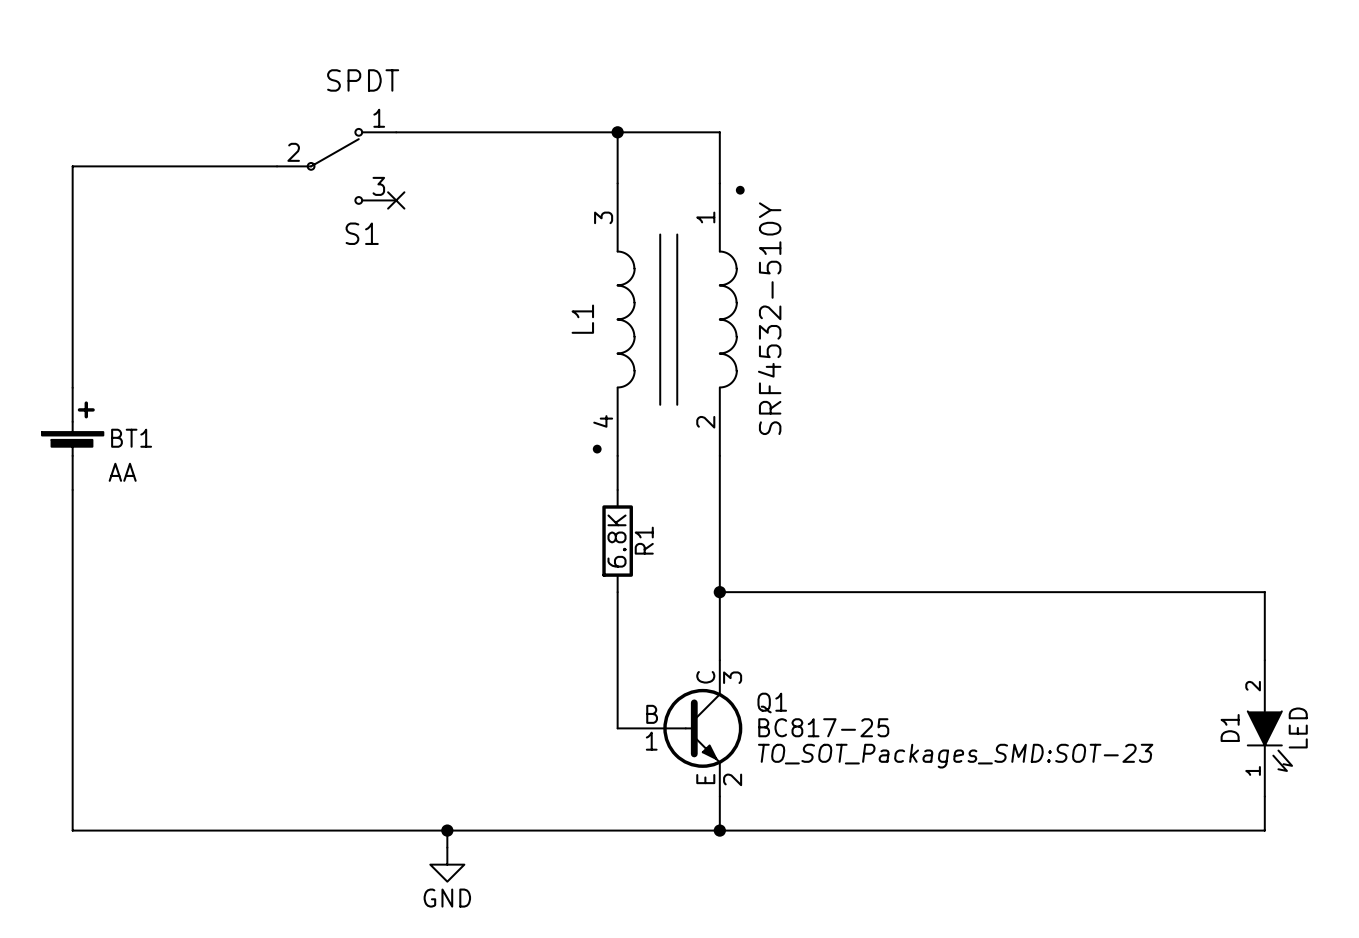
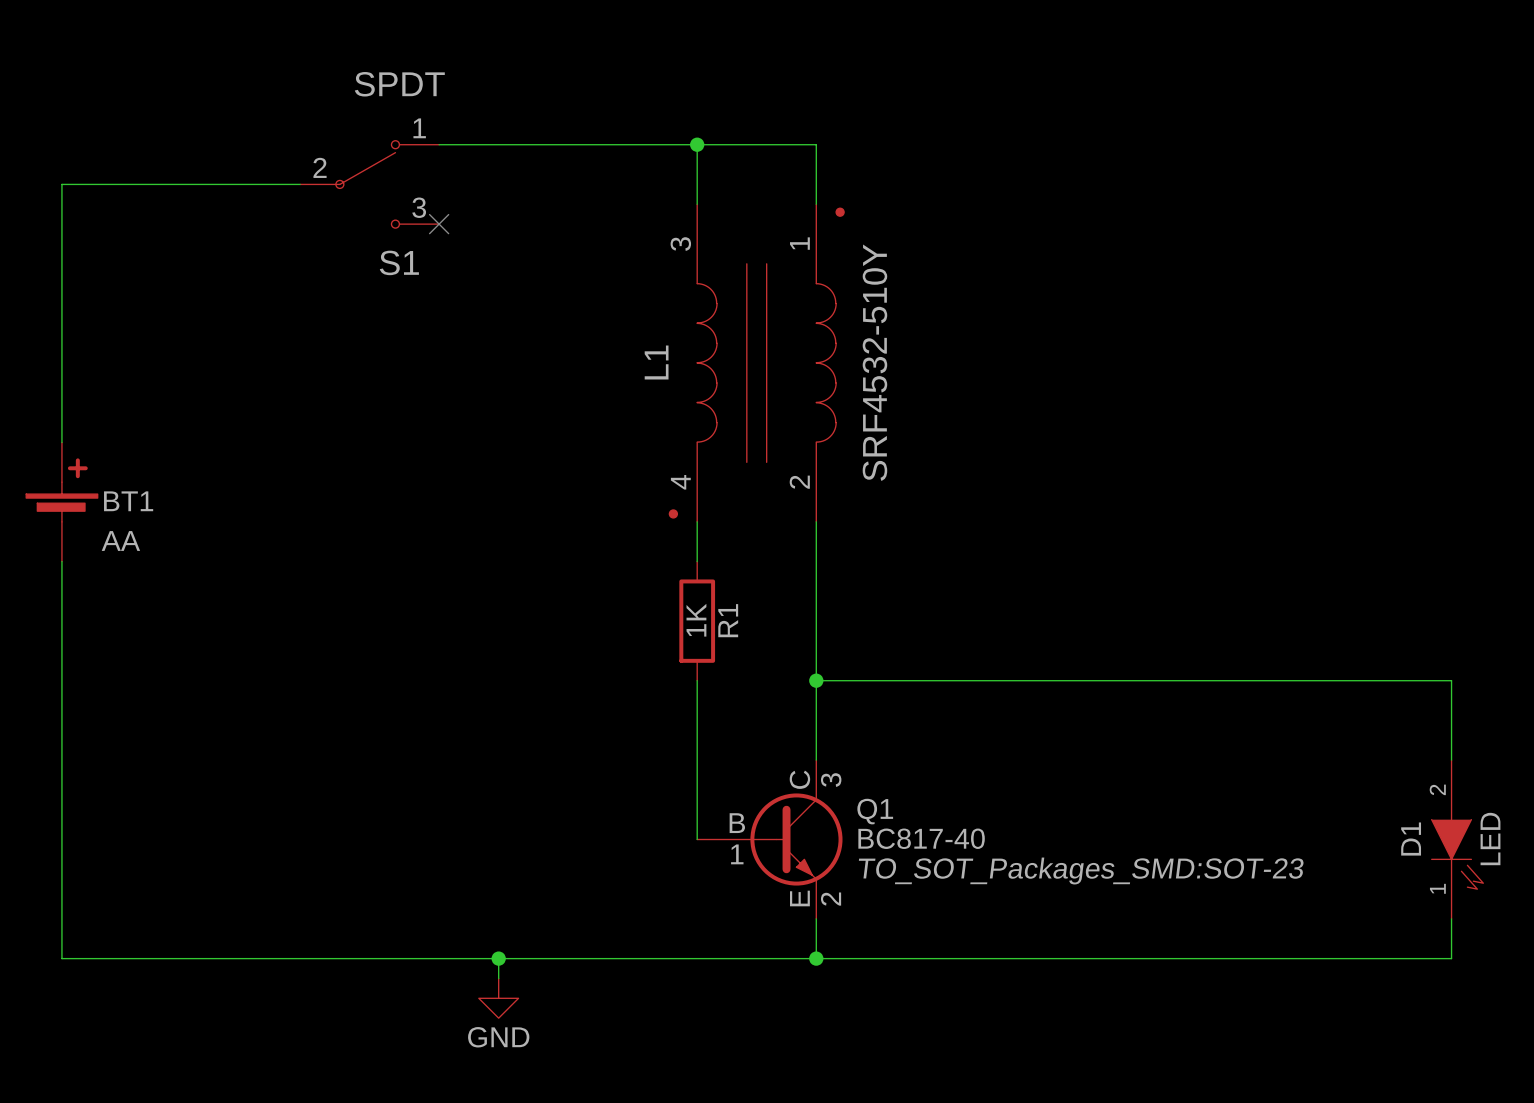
R1 value: 6.8K (617, 541) -> 1K (696, 620)
Q1 value: BC817-25 (823, 727) -> BC817-40 (921, 838)

